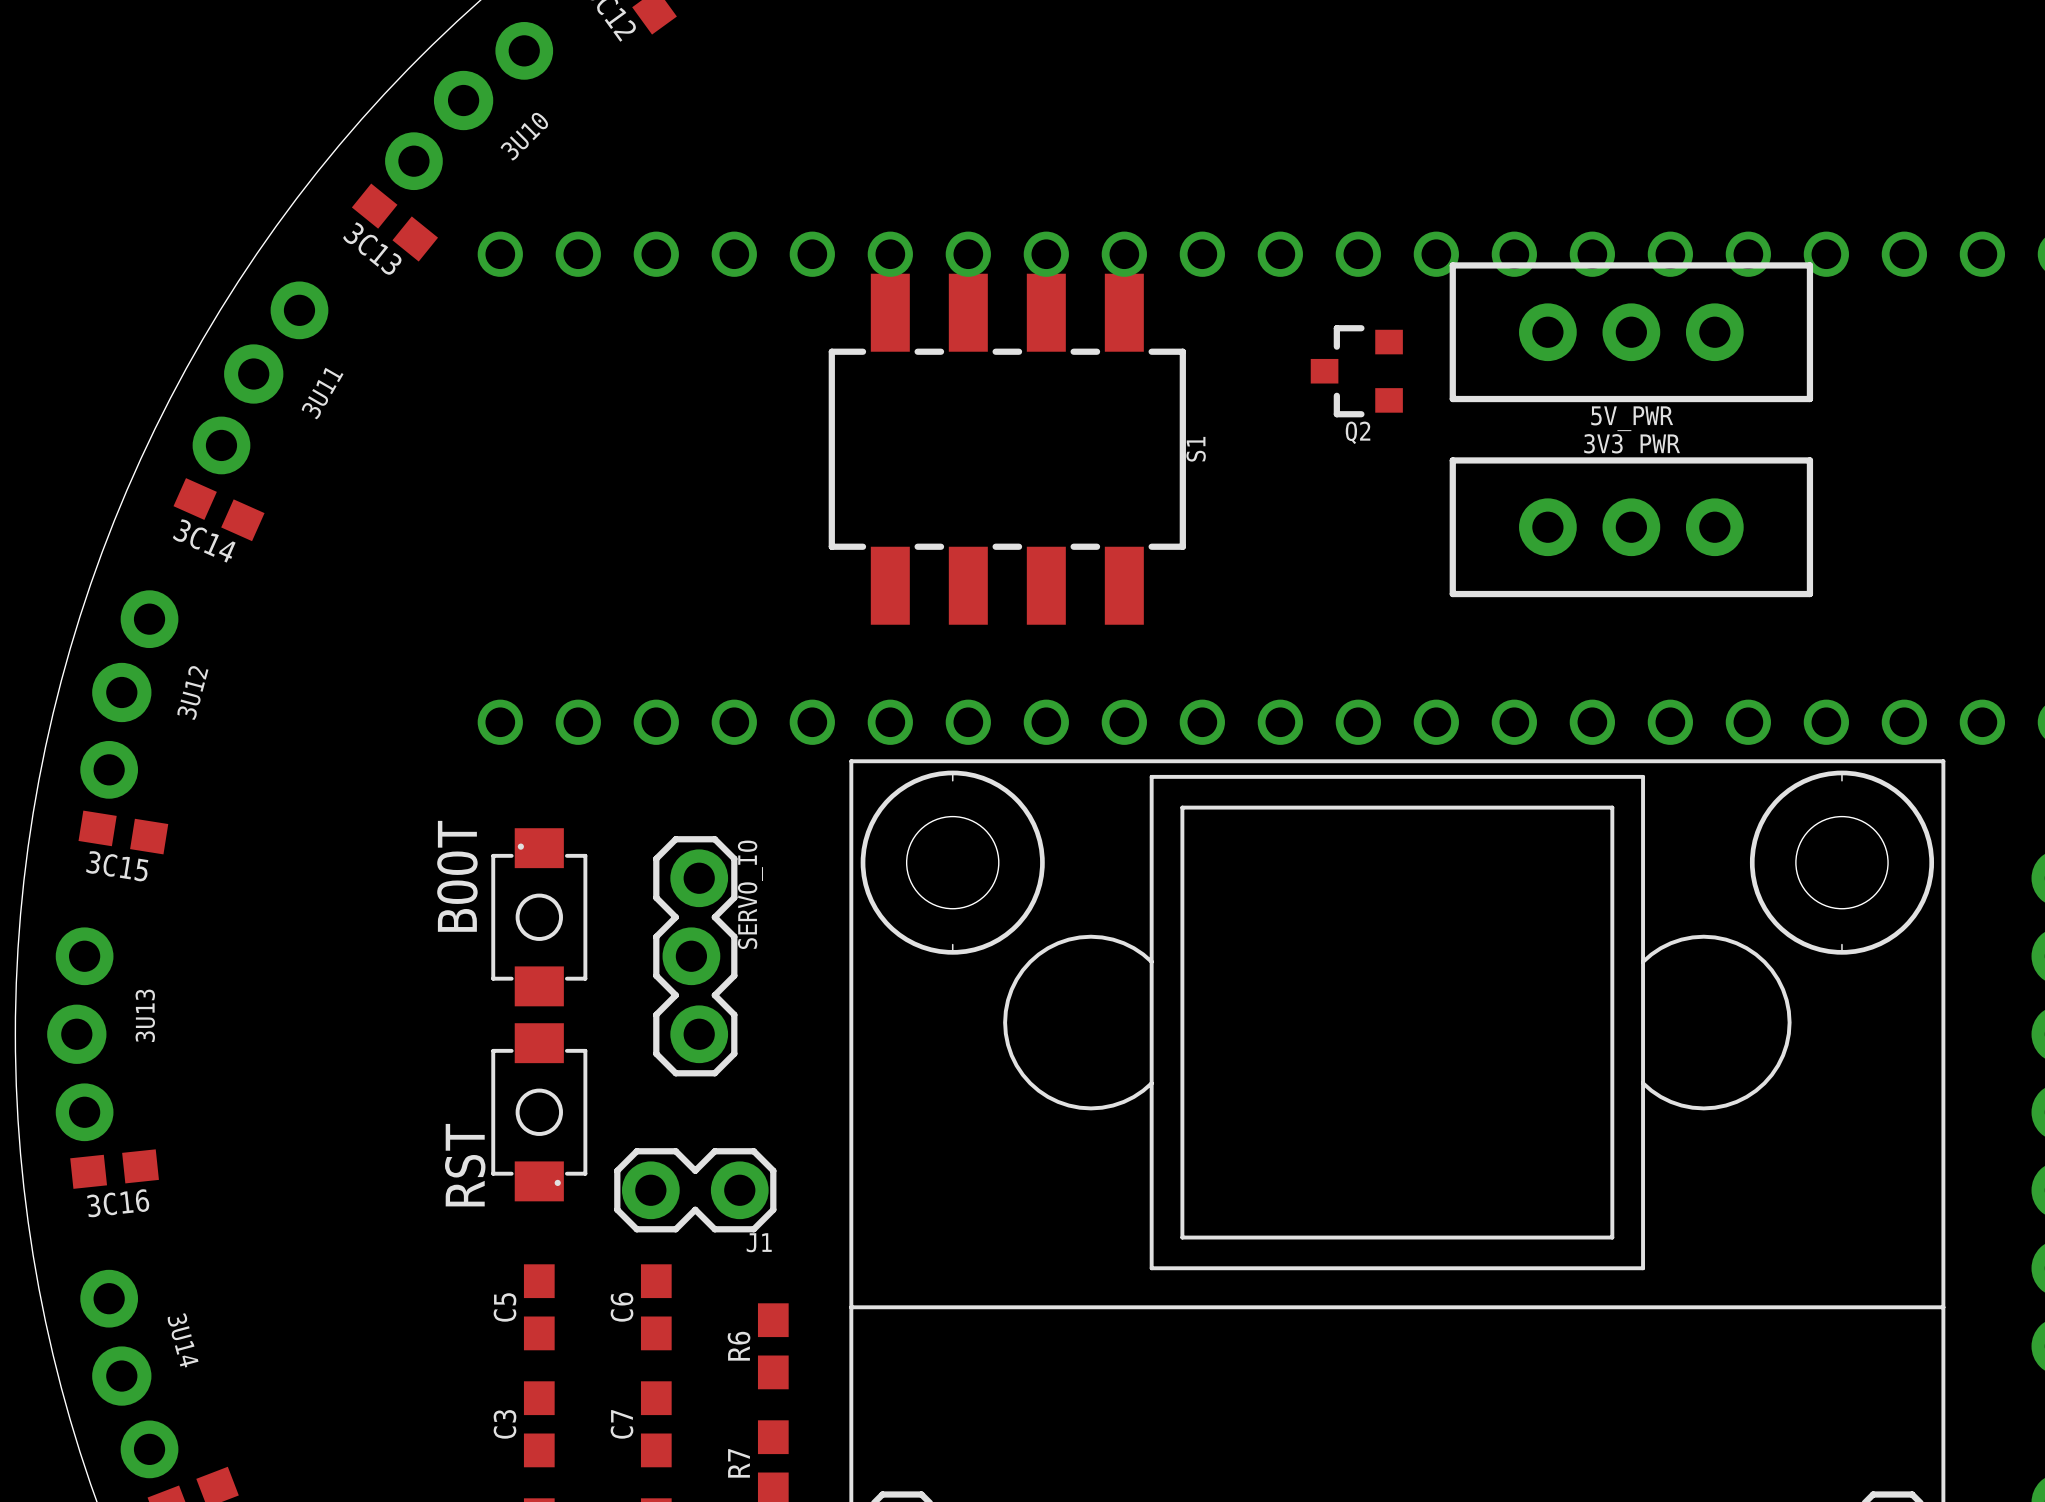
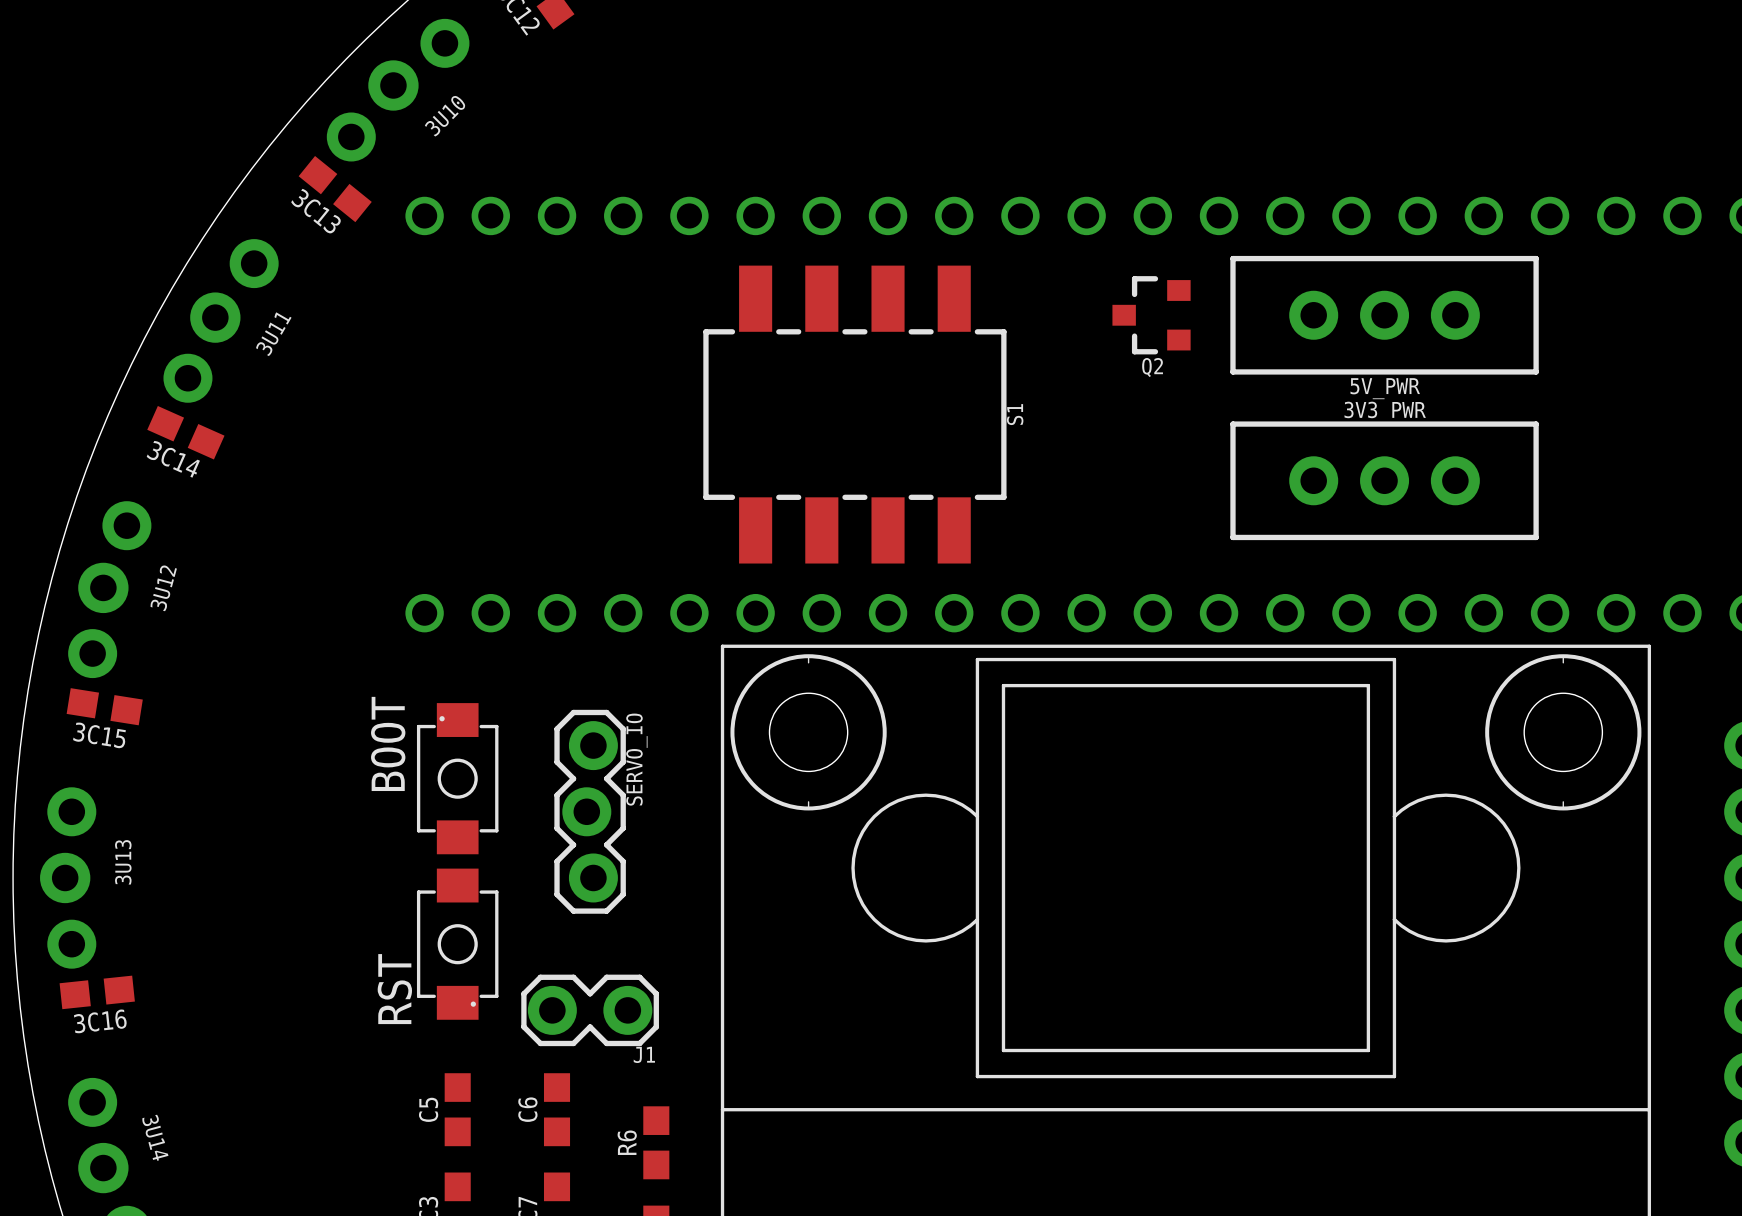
5V_PWR position: (1631, 332) -> (1384, 315)
S1 position: (1007, 449) -> (854, 414)
3V3_PWR position: (1631, 527) -> (1384, 480)

